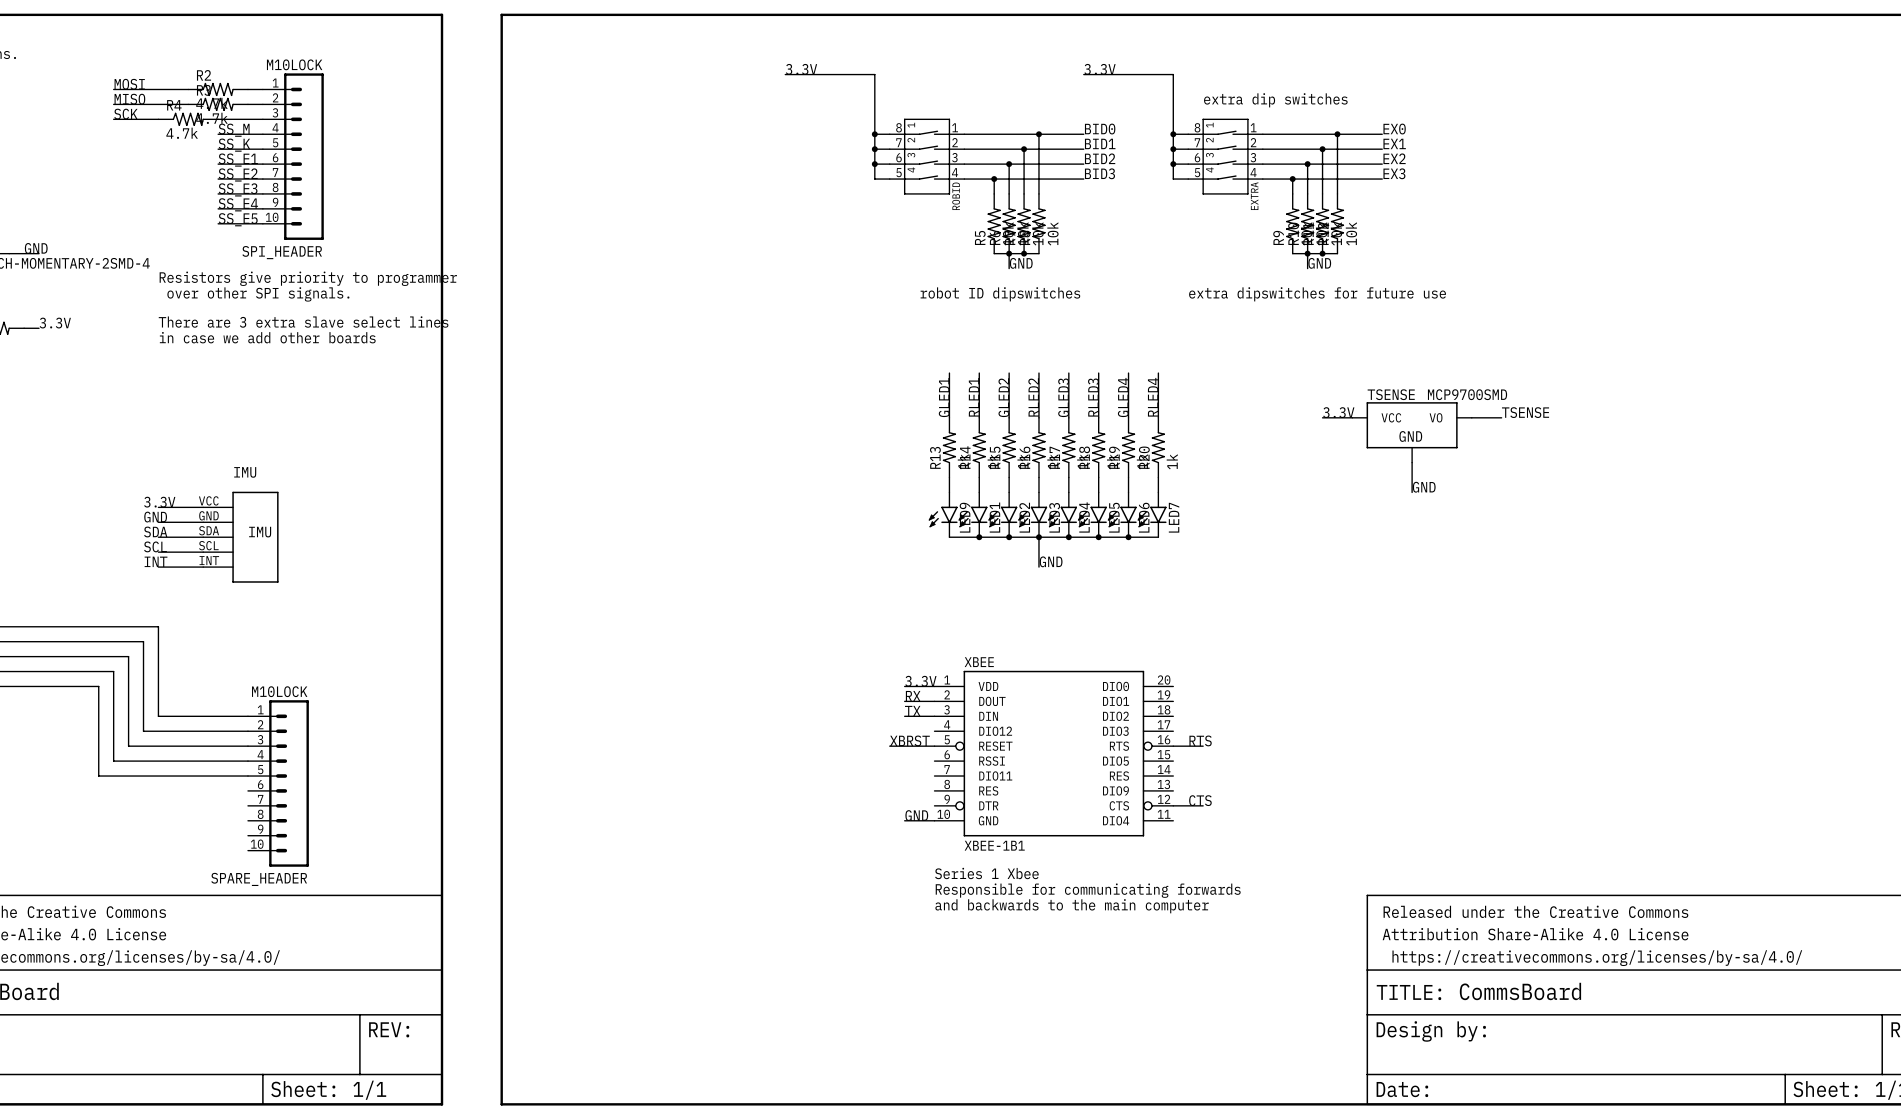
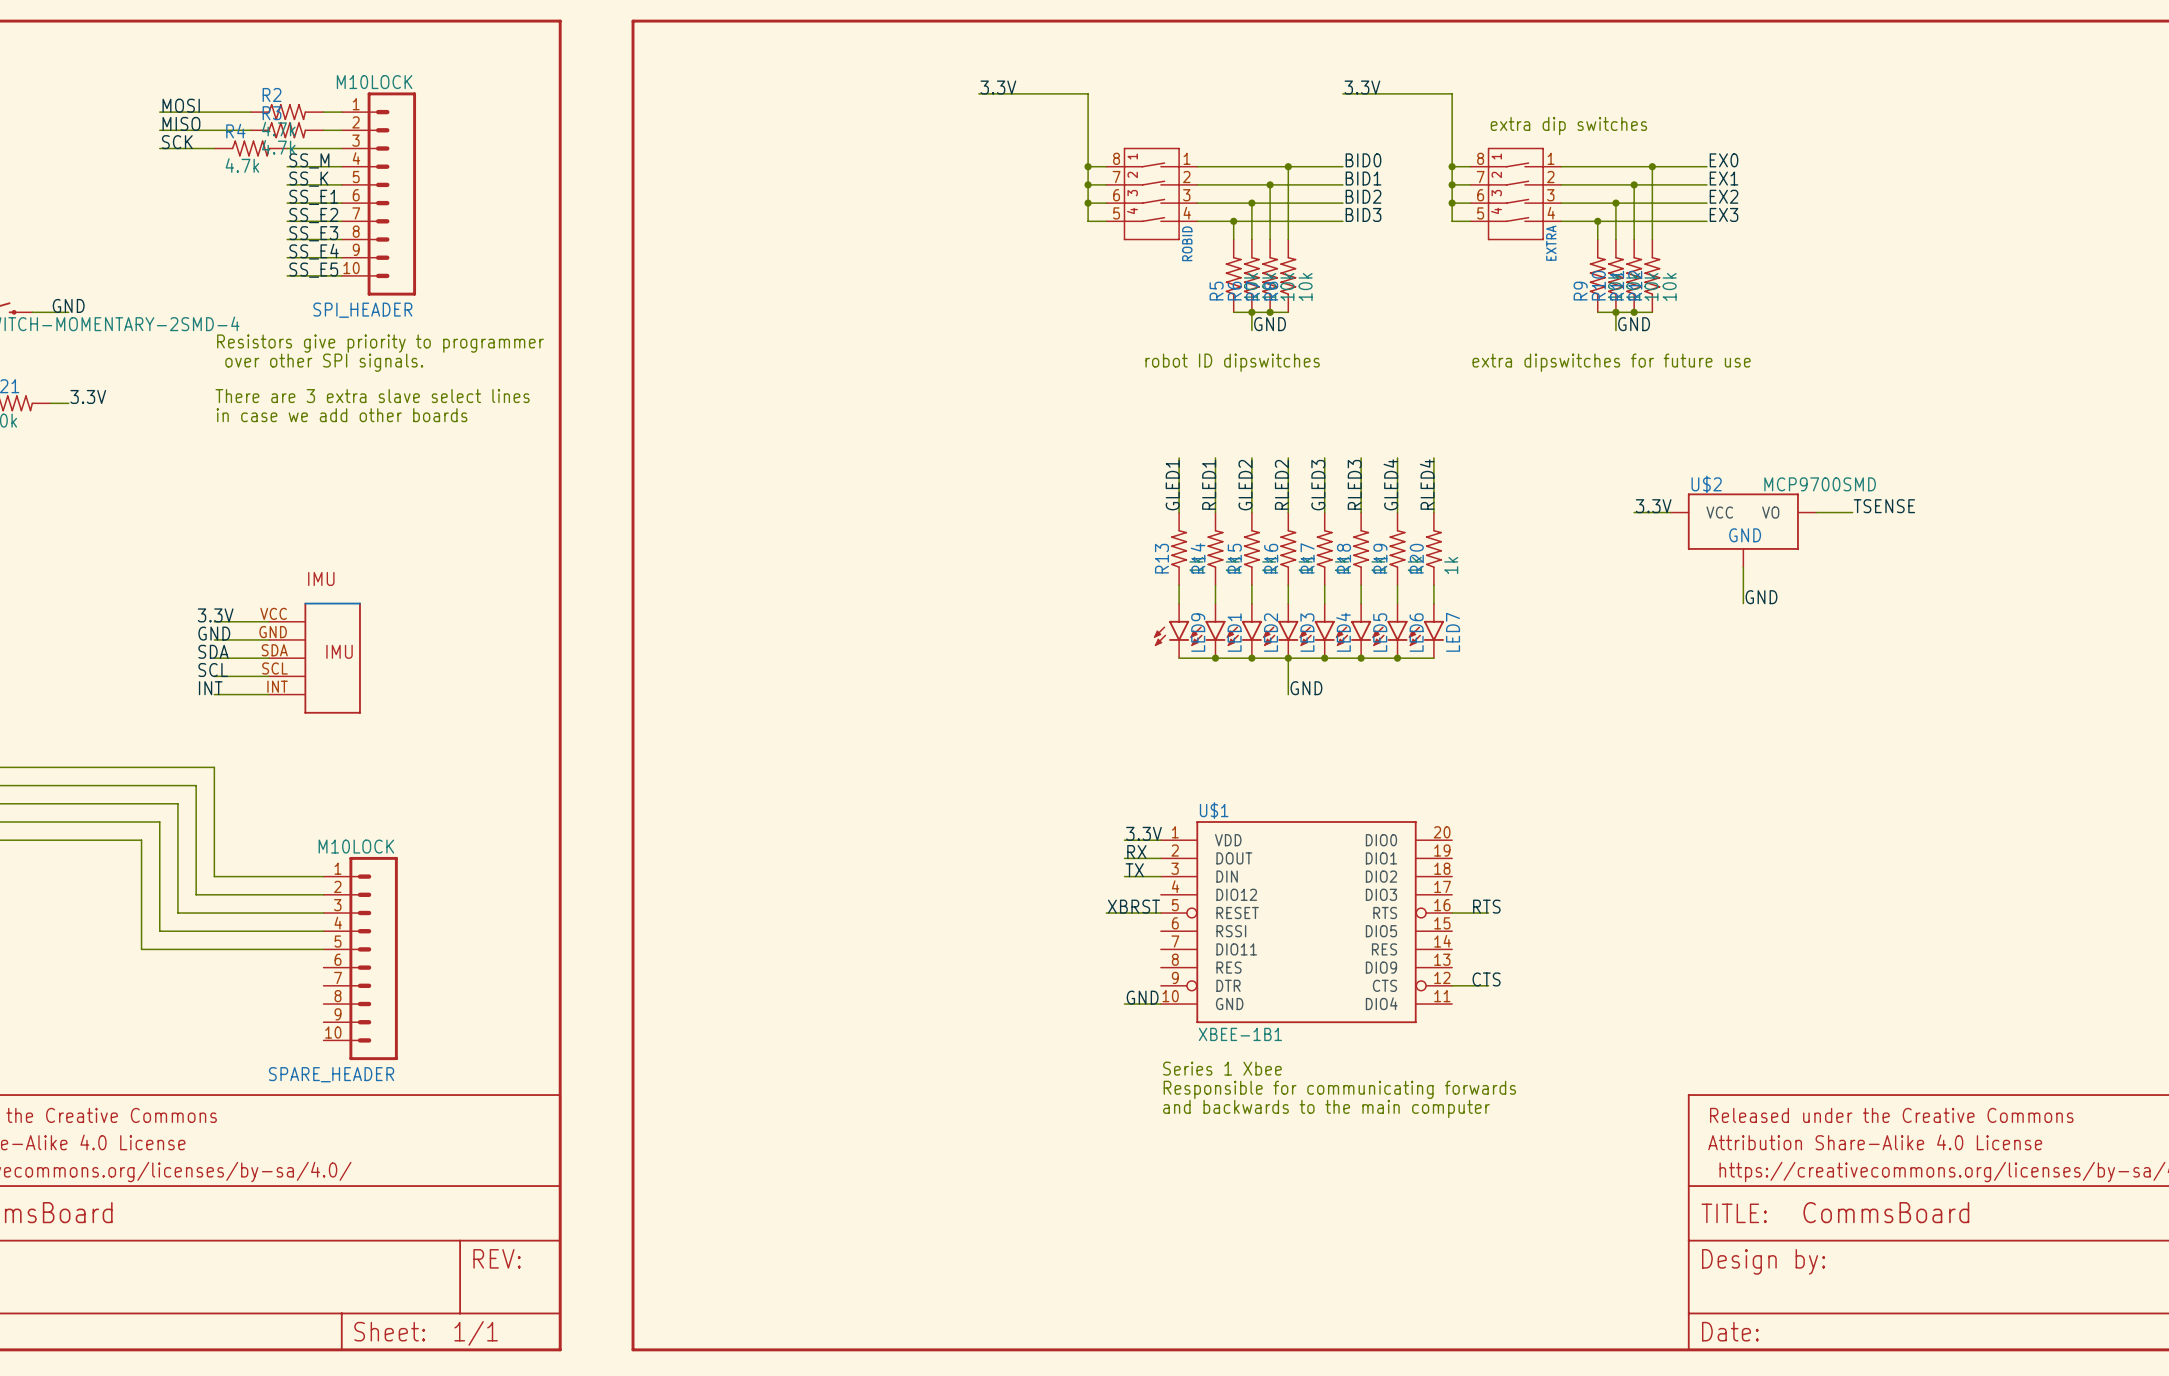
TSENSE name: TSENSE (1391, 394) -> U$2 (1706, 484)
XBEE name: XBEE (979, 662) -> U$1 (1214, 810)

